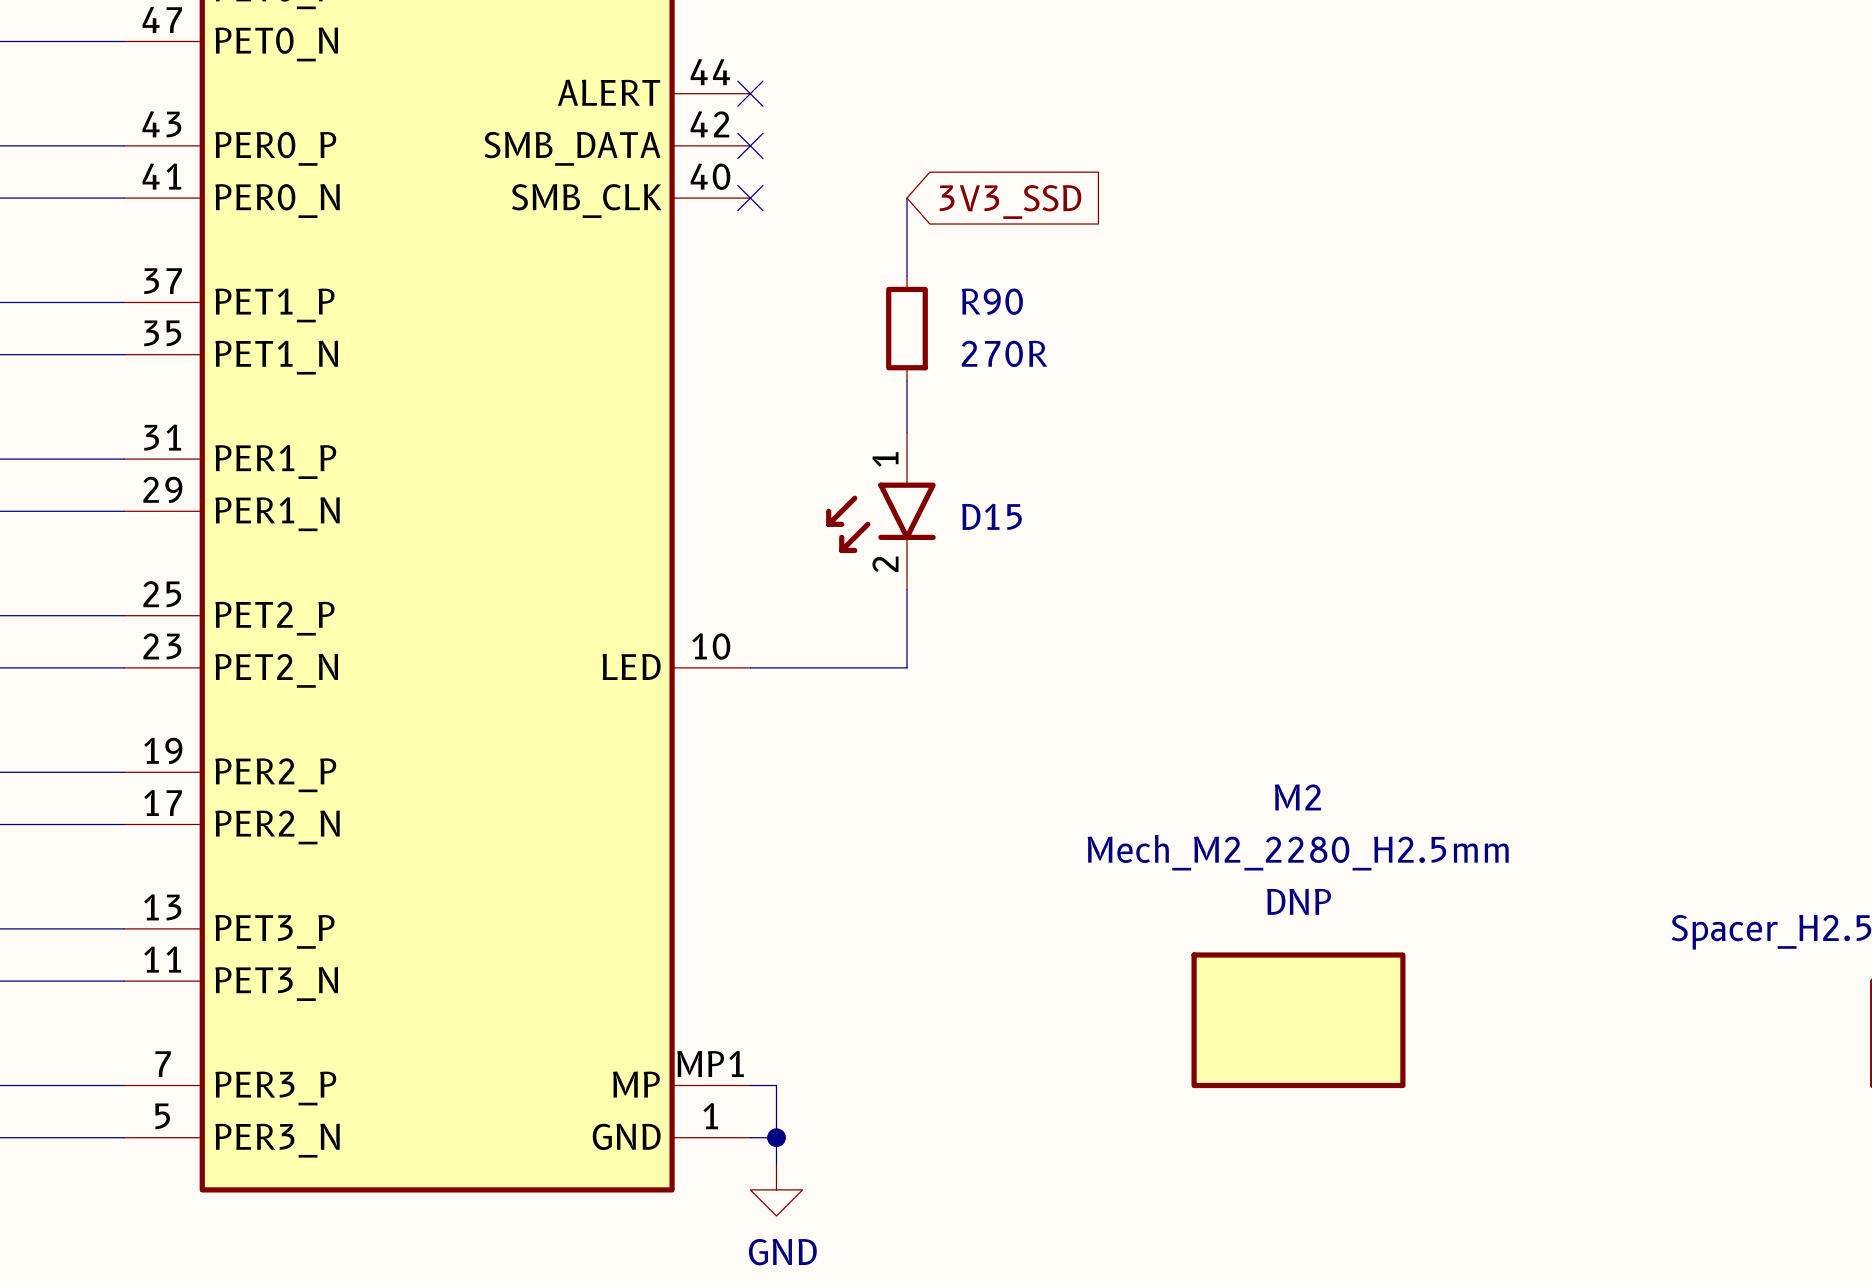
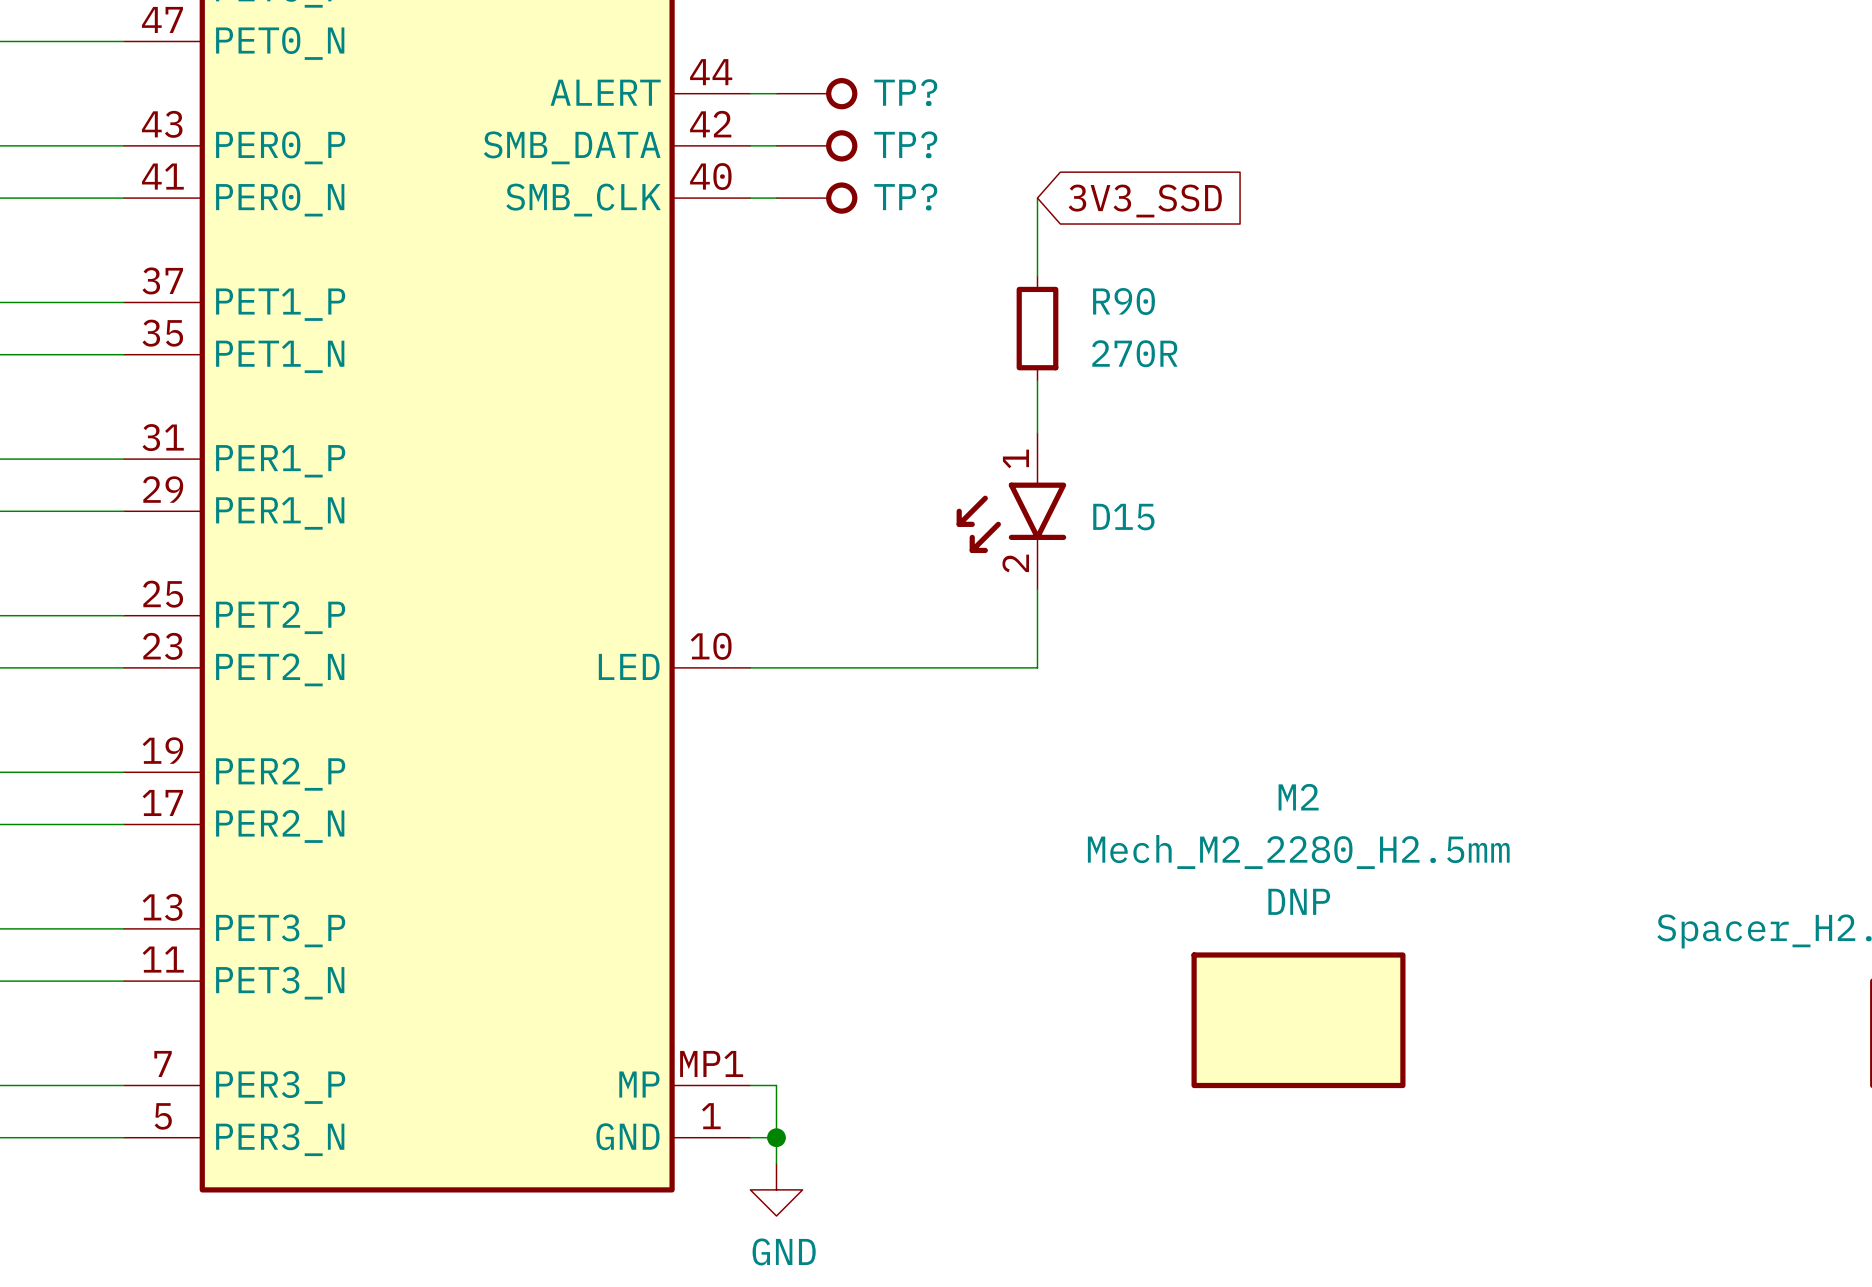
wire: none -> (750, 93) (776, 93)
no-connect mark: (750, 93) -> none
TP?: none -> (816, 93)
wire: none -> (750, 145) (776, 145)
no-connect mark: (750, 145) -> none
TP?: none -> (816, 145)
wire: none -> (750, 198) (776, 198)
no-connect mark: (750, 198) -> none
TP?: none -> (816, 198)
wire: (906, 198) (906, 276) -> (1037, 198) (1037, 276)
global label position: 3V3_SSD (1010, 201) -> 3V3_SSD (1145, 201)
R90 position: (906, 328) -> (1037, 328)
wire: (906, 380) (906, 432) -> (1037, 380) (1037, 432)
D15 position: (880, 511) -> (1011, 511)
wire: (906, 589) (906, 667) -> (1037, 589) (1037, 667) (906, 667)

